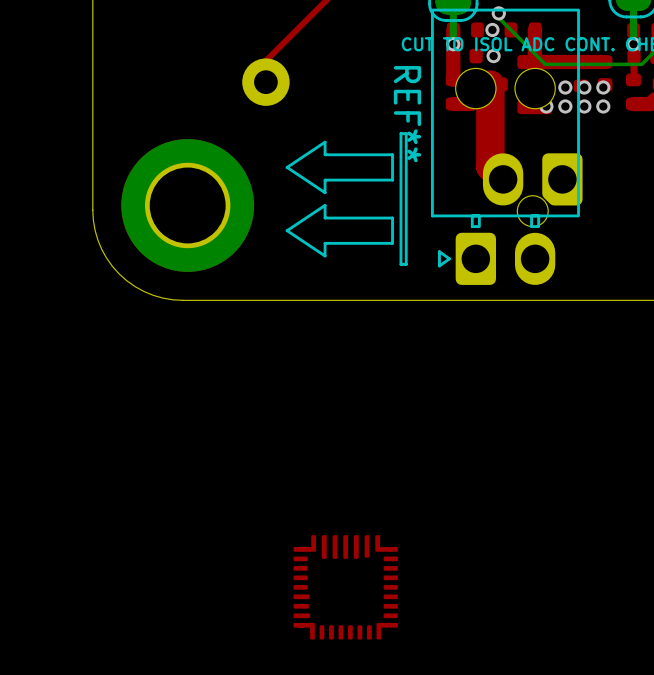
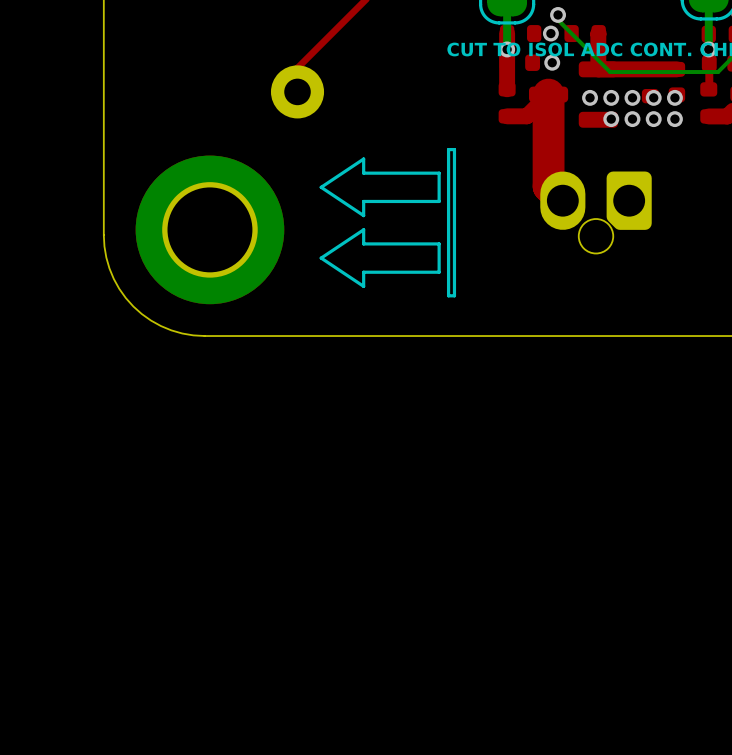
REF**: (505, 146) -> none
part: (345, 587) -> none

